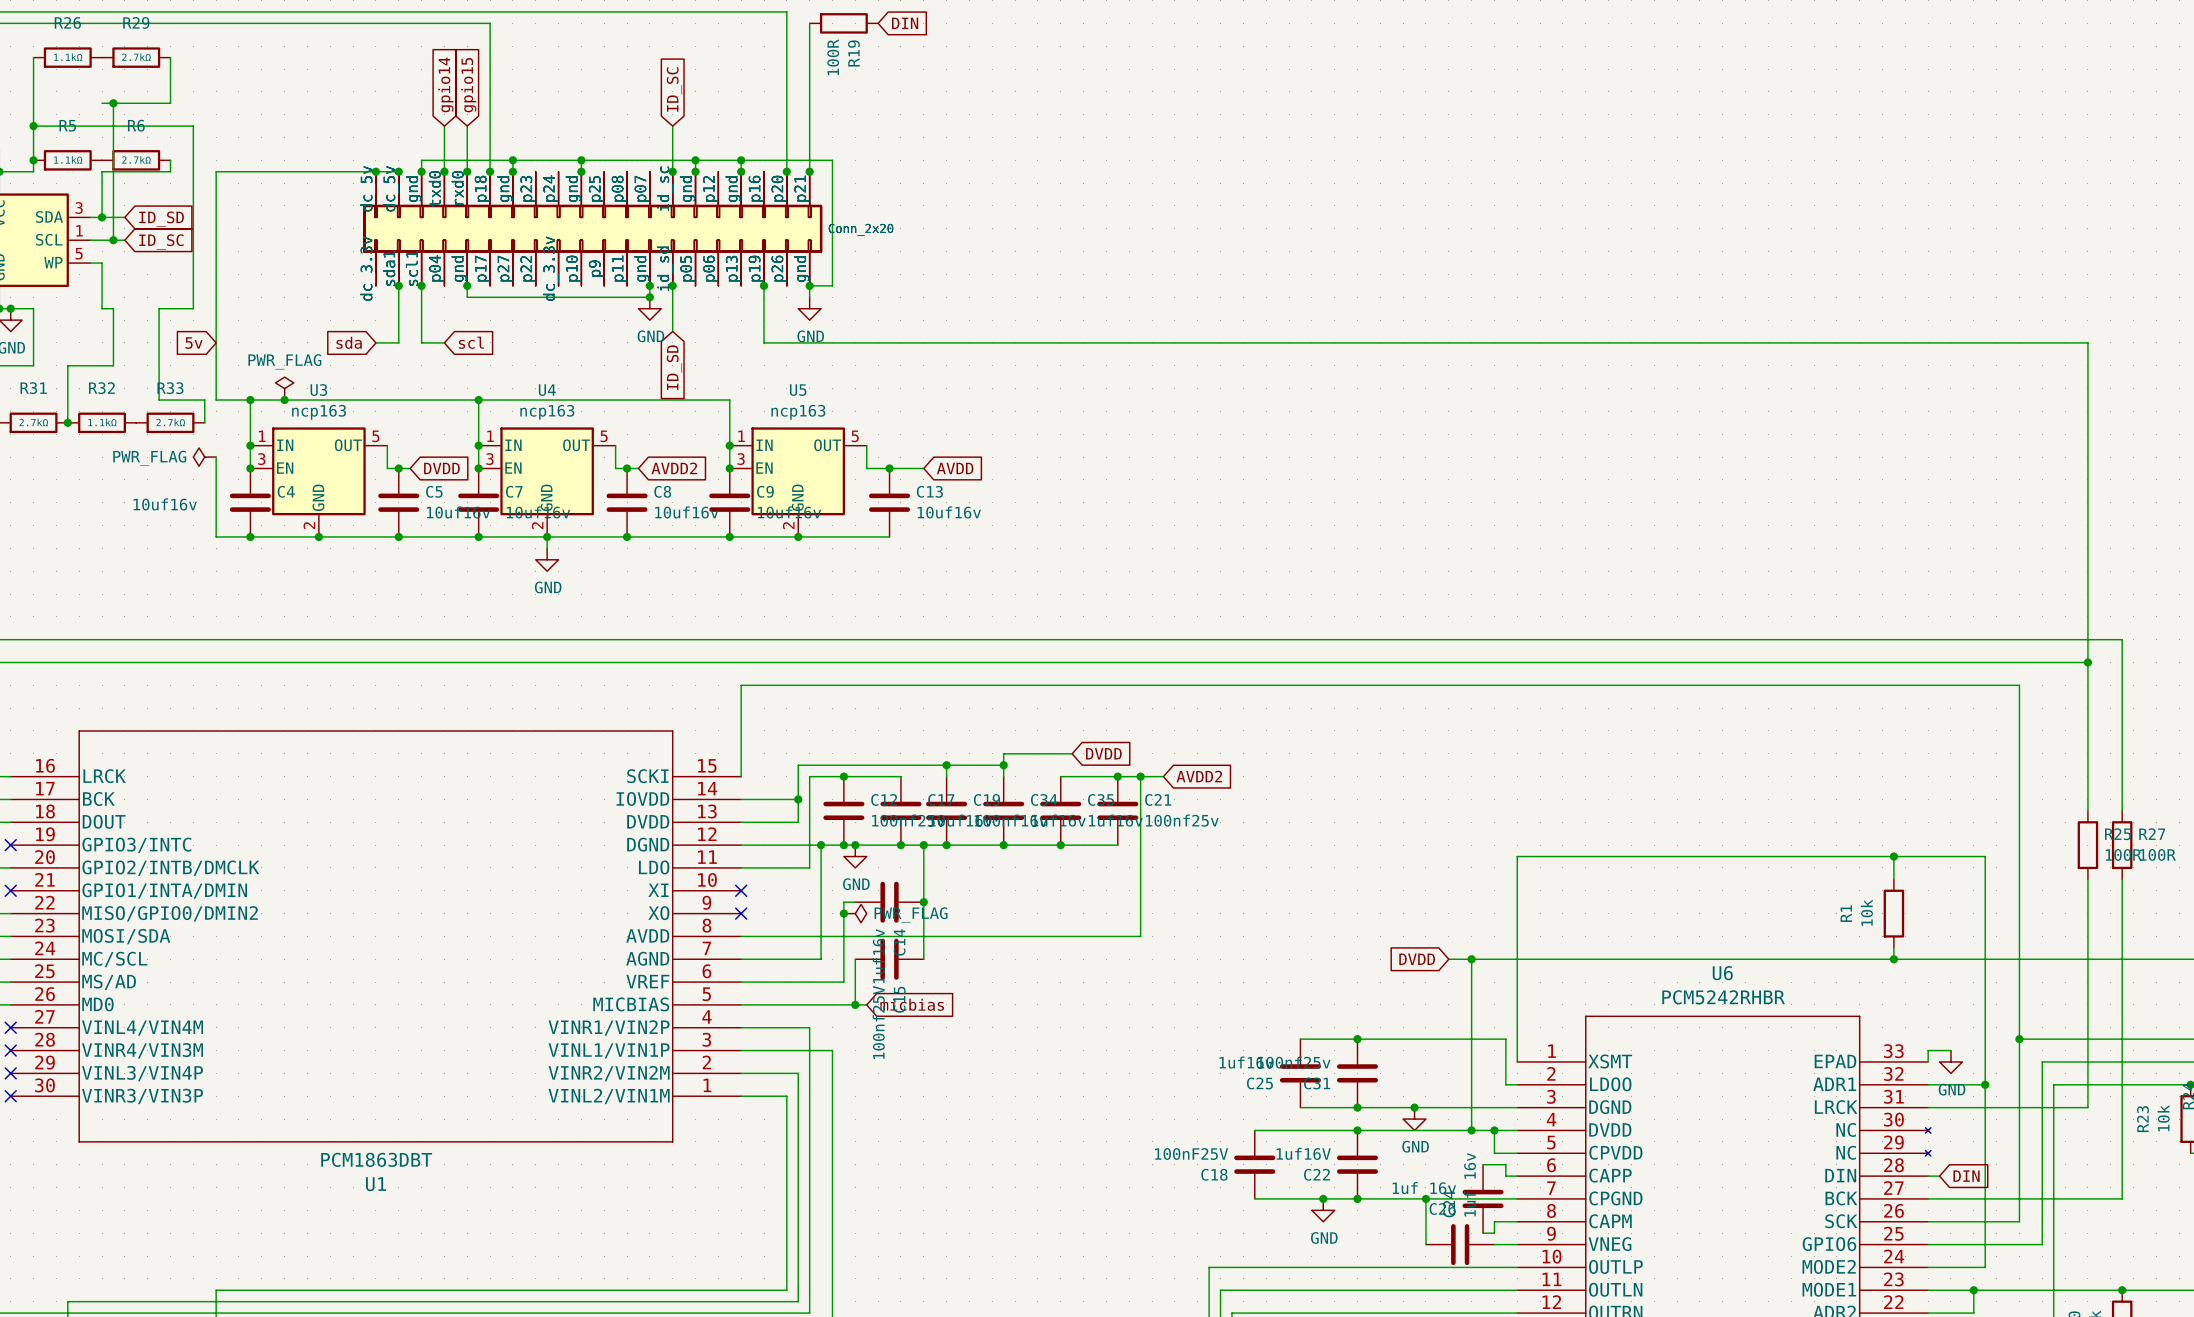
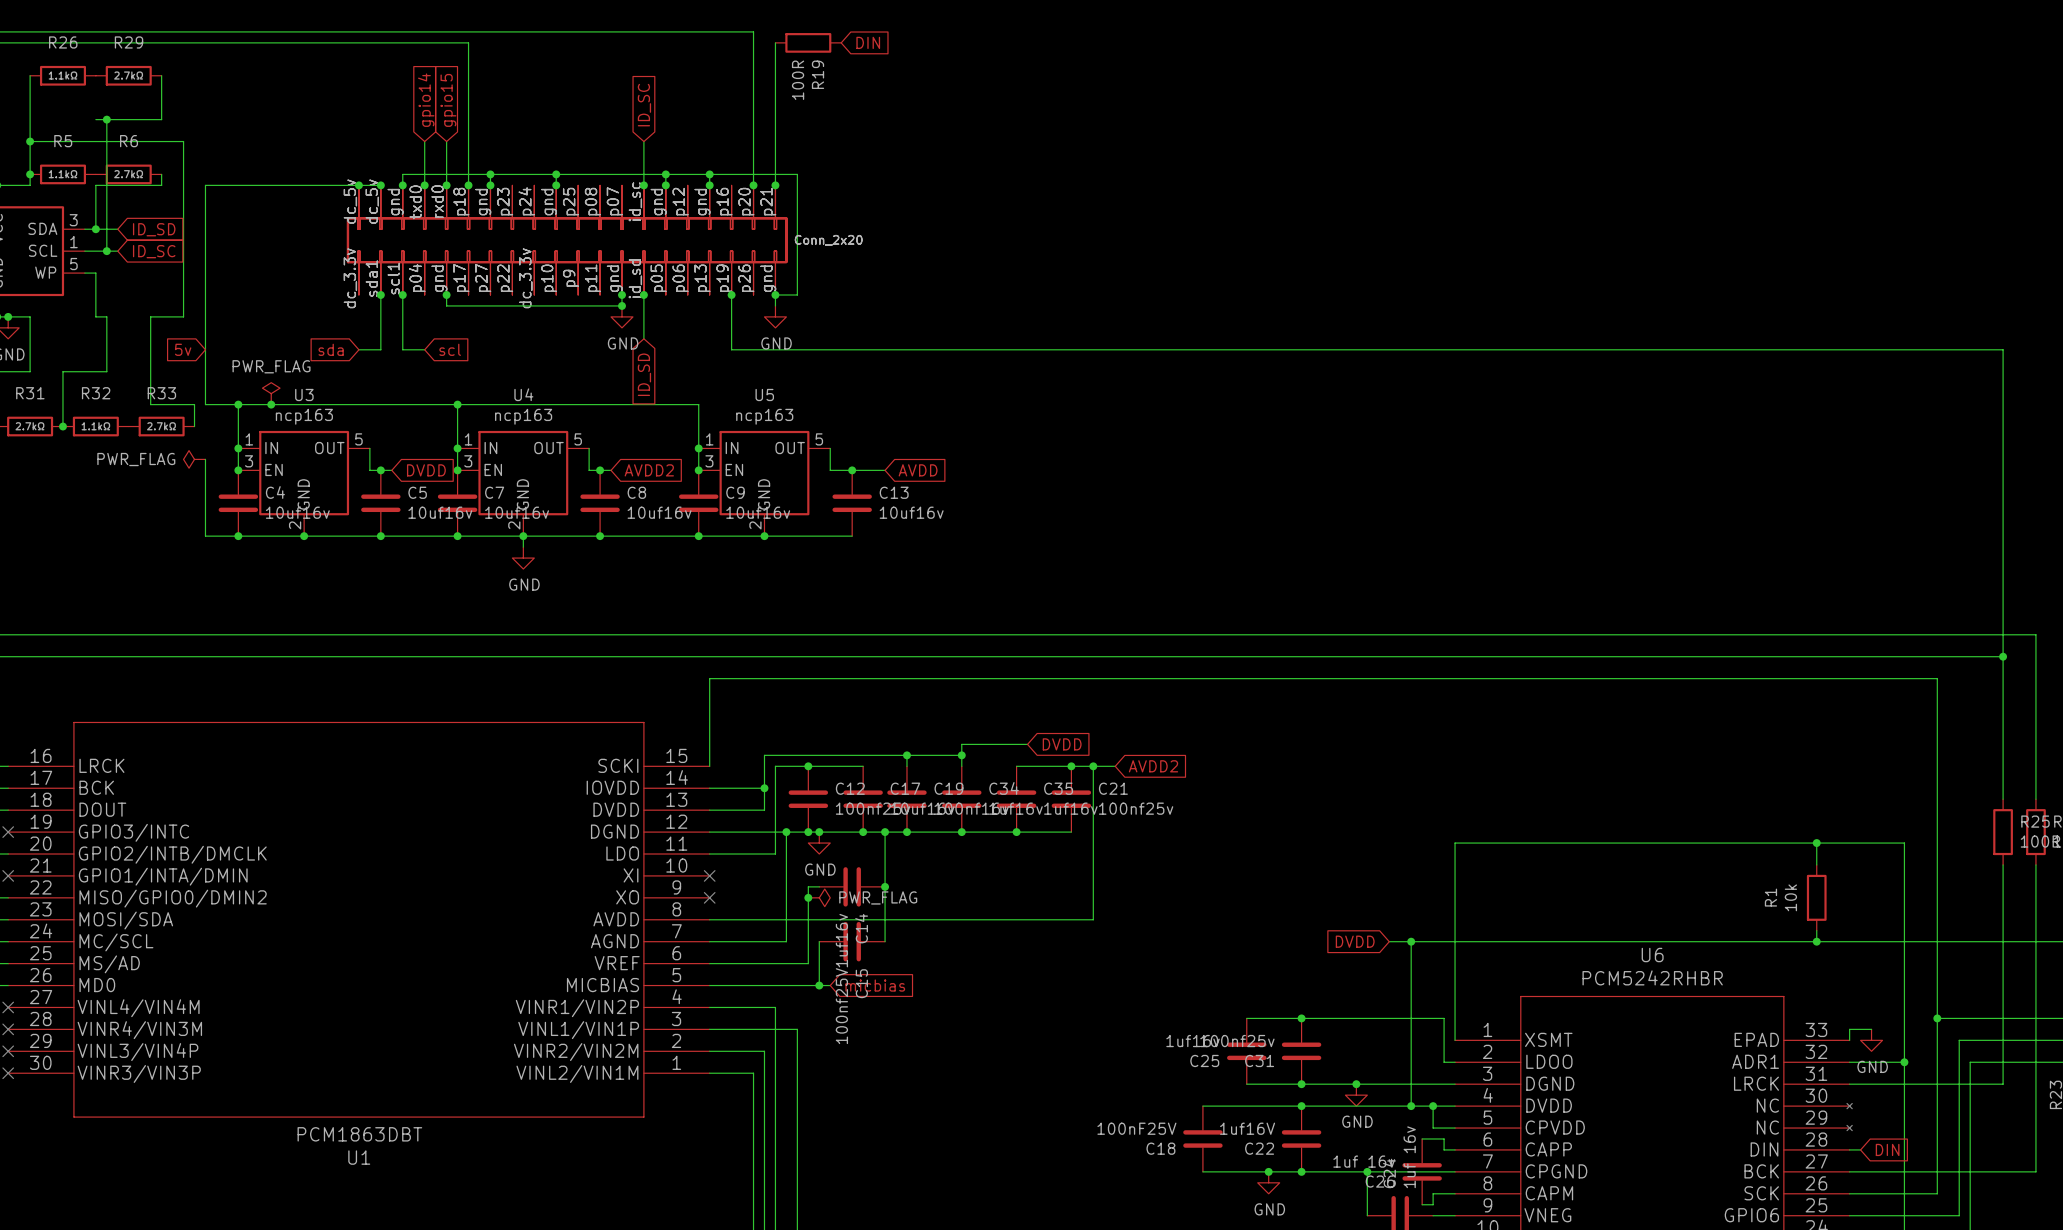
C4 value position: 10uf16v (165, 504) -> 10uf16v (297, 512)

